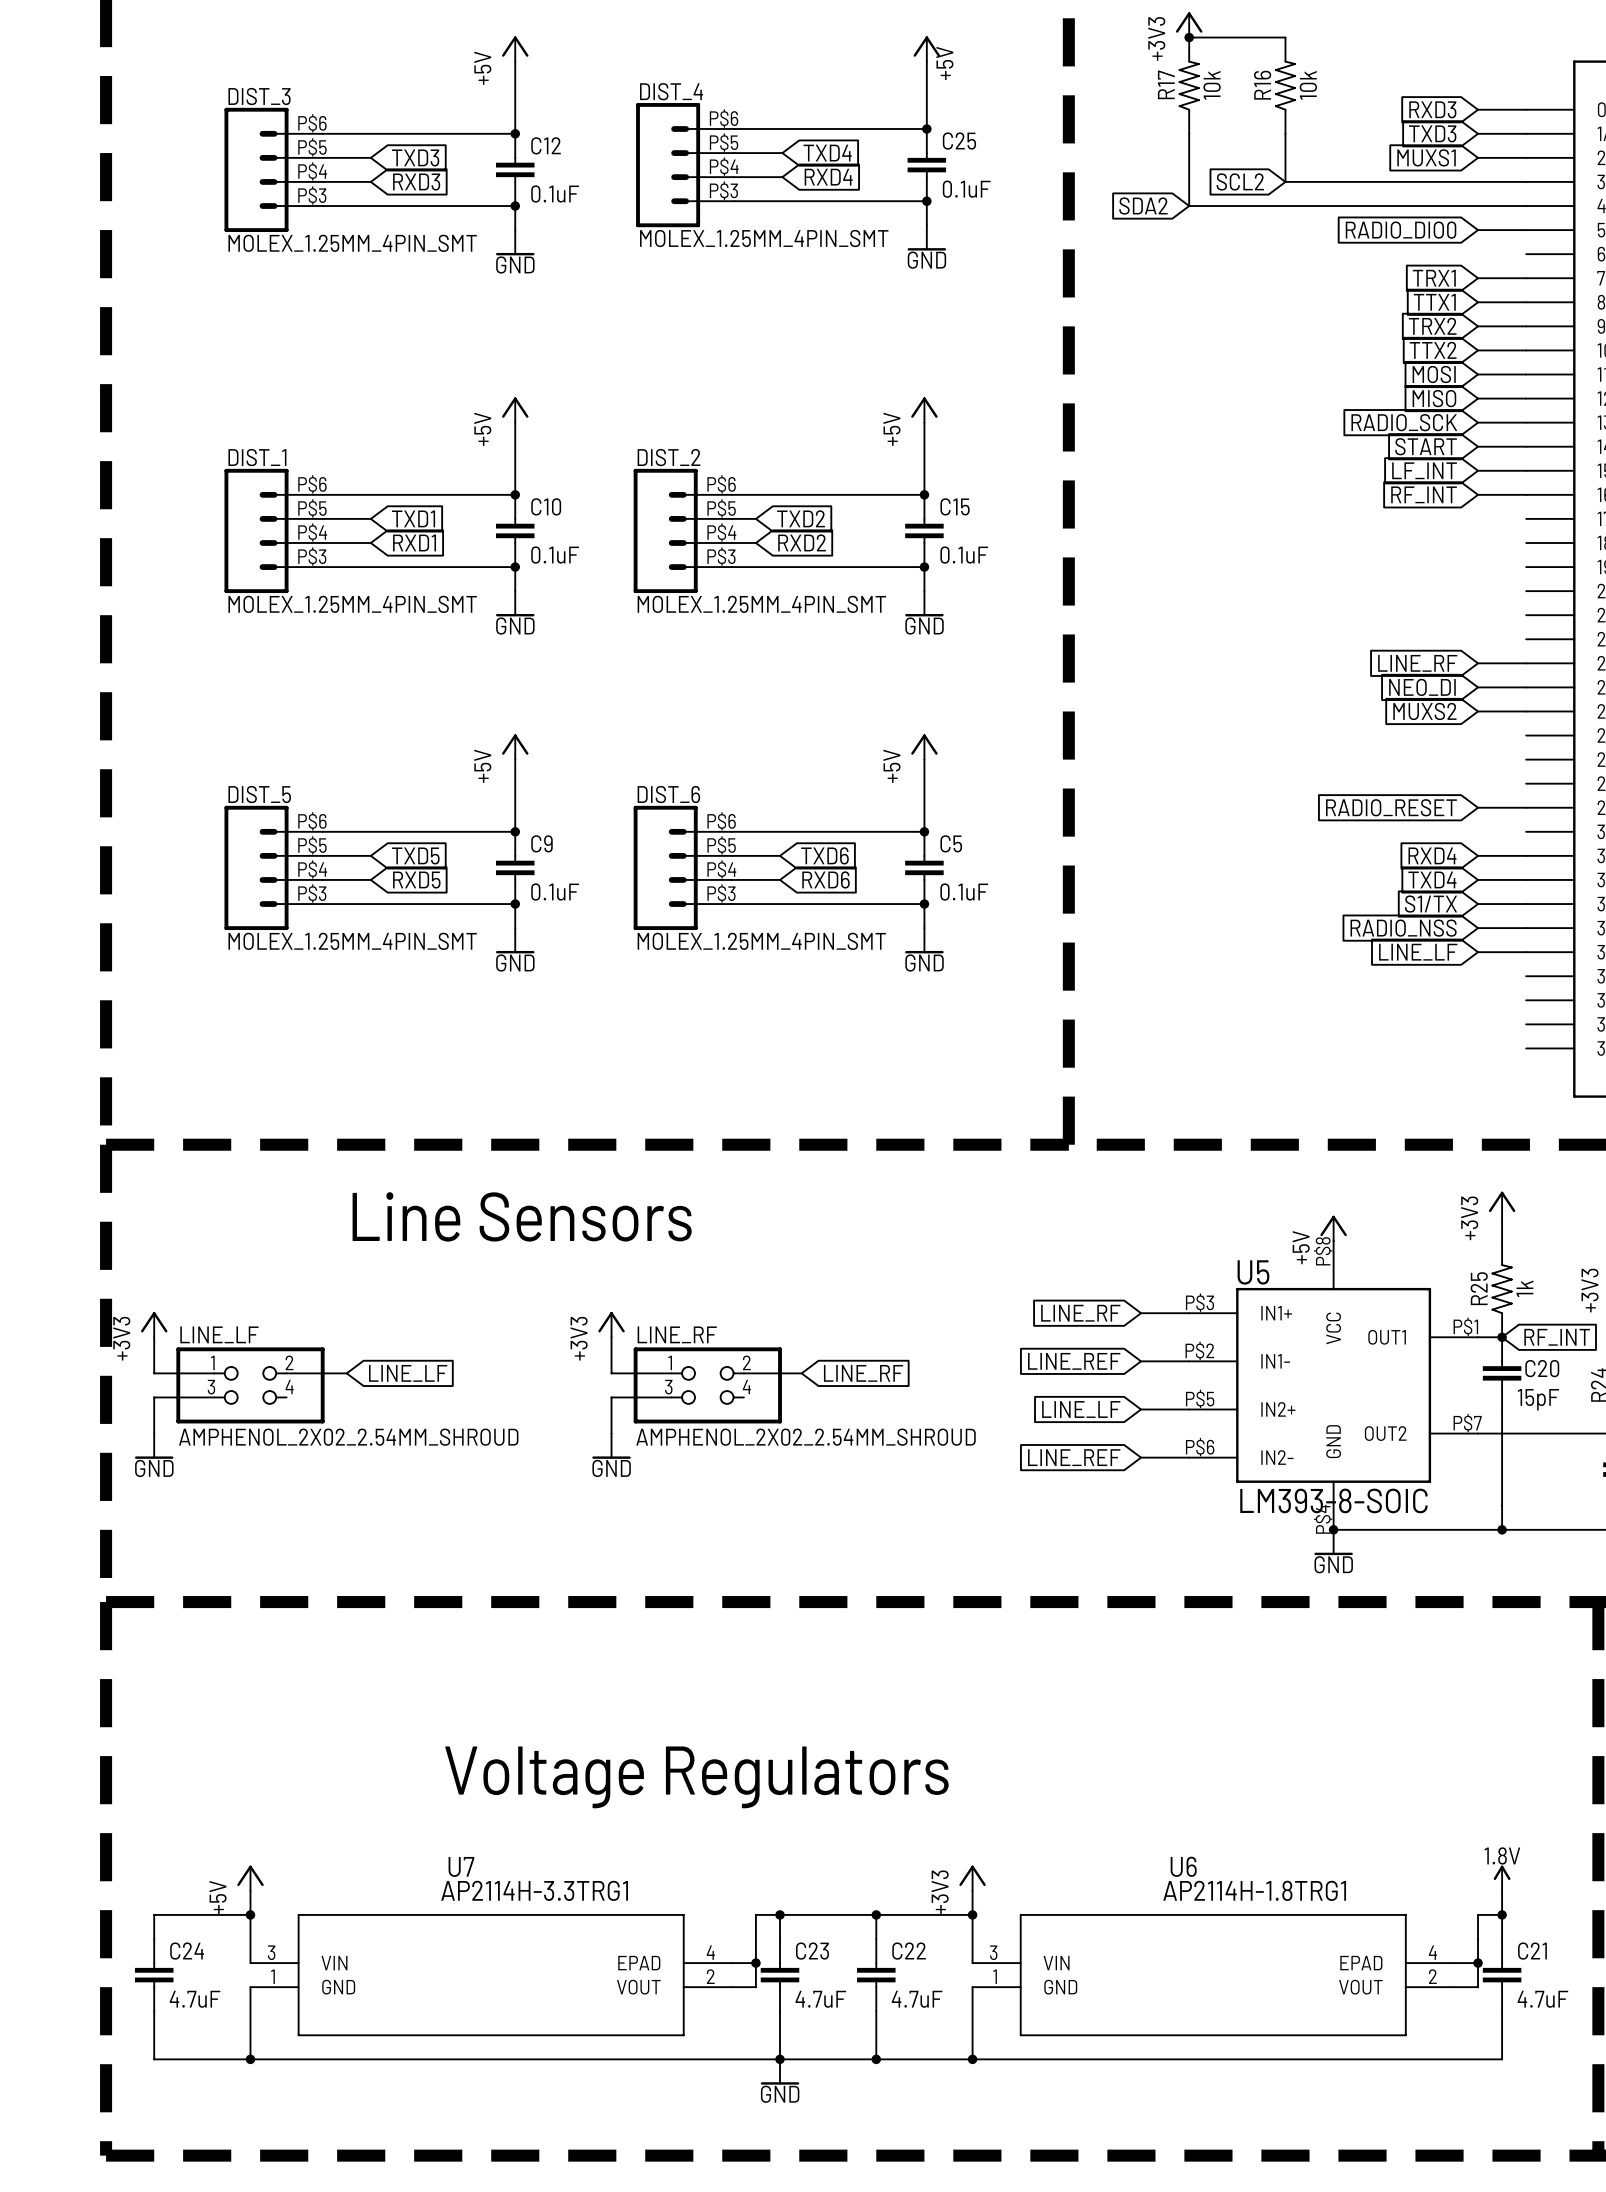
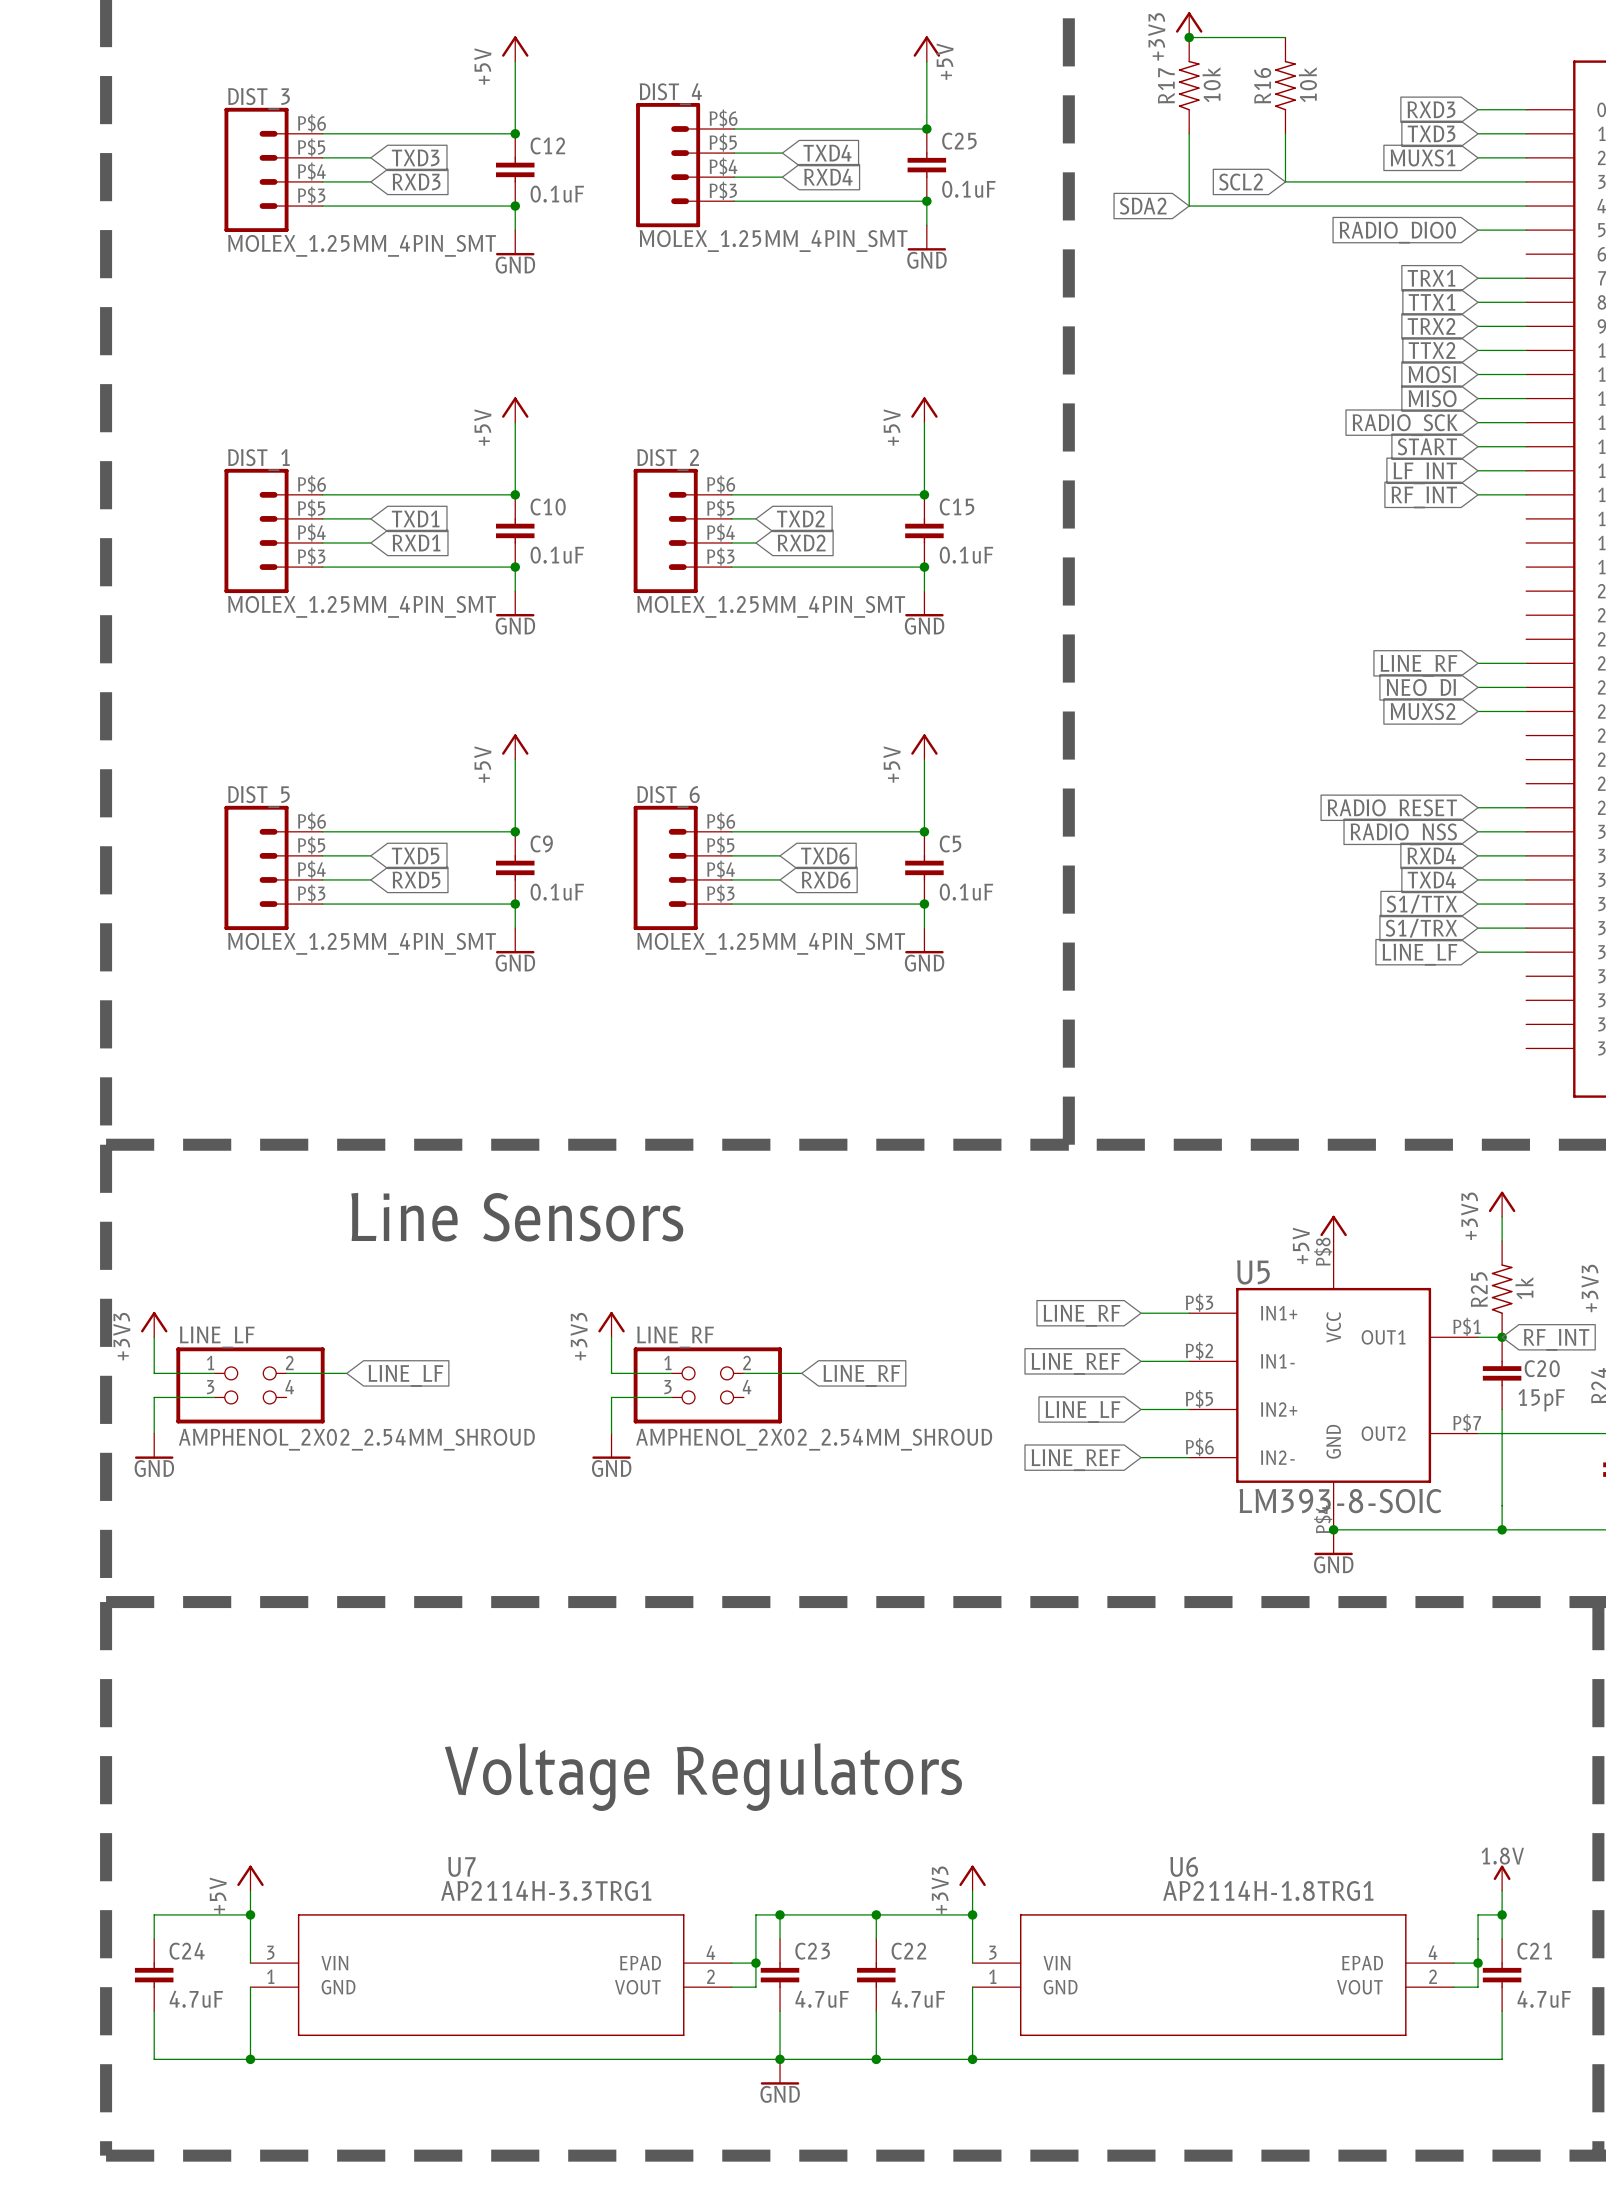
global label: none -> RADIO_NSS (1403, 834)
wire: none -> (1478, 831) (1526, 831)
global label: S1/TX (1430, 904) -> S1/TTX (1421, 904)
global label: RADIO_NSS (1403, 928) -> S1/TRX (1421, 928)

